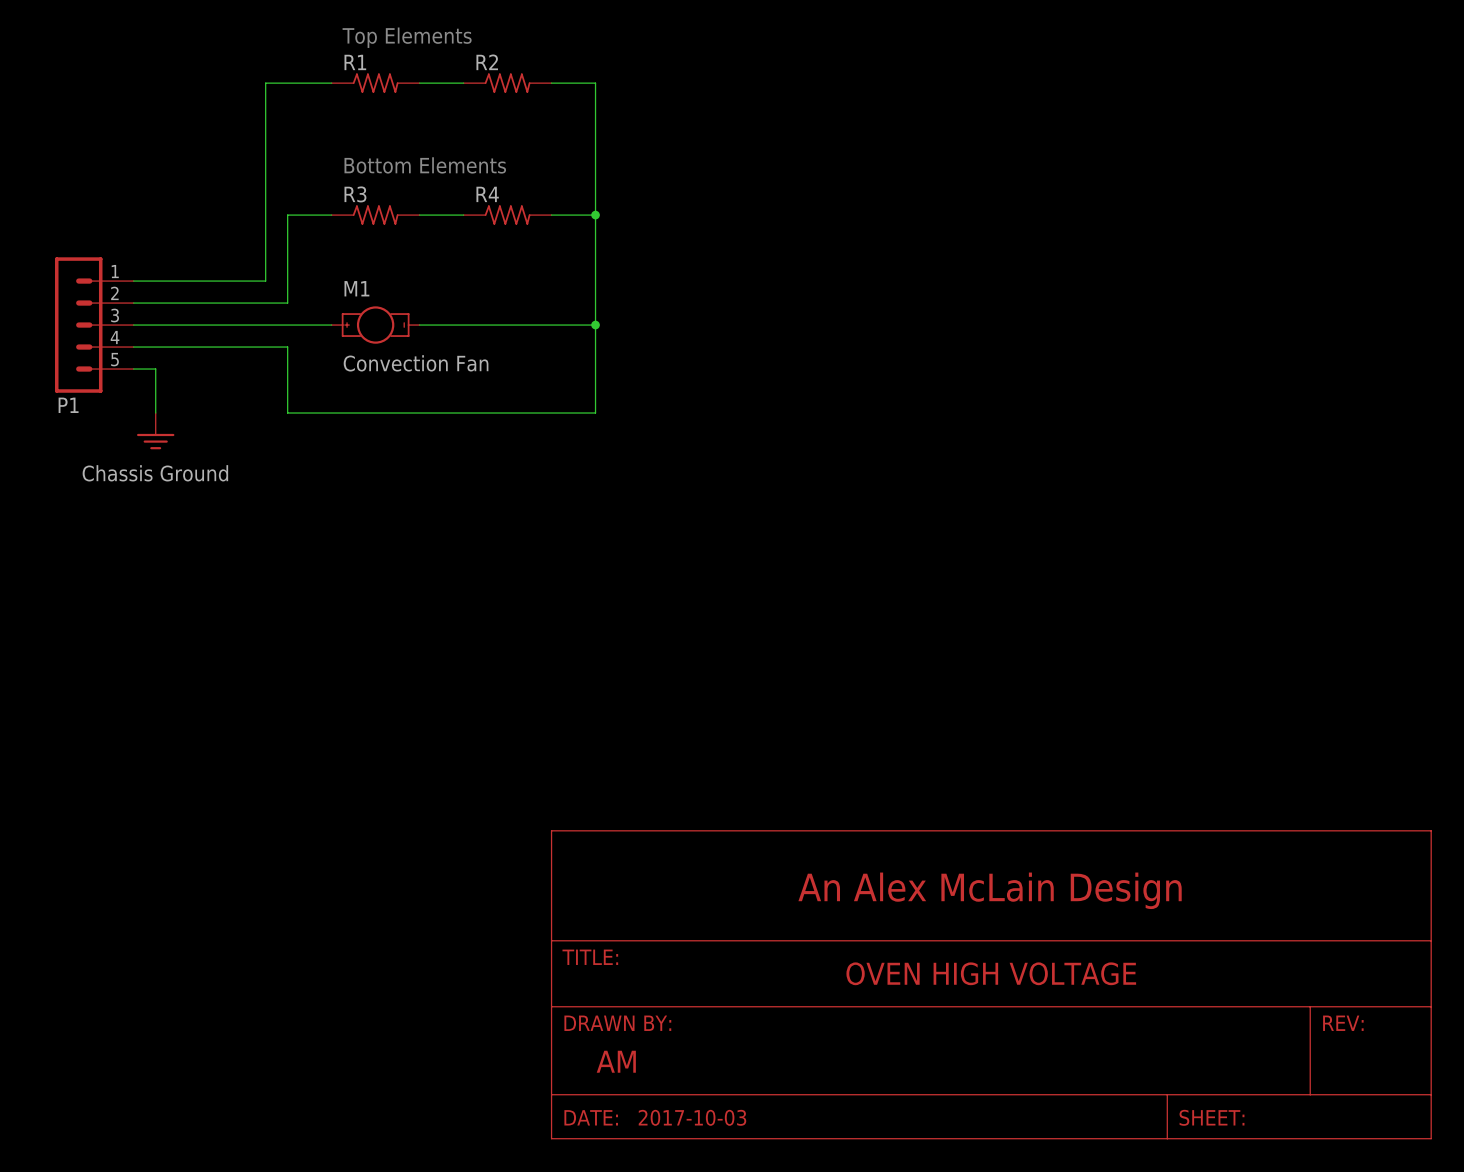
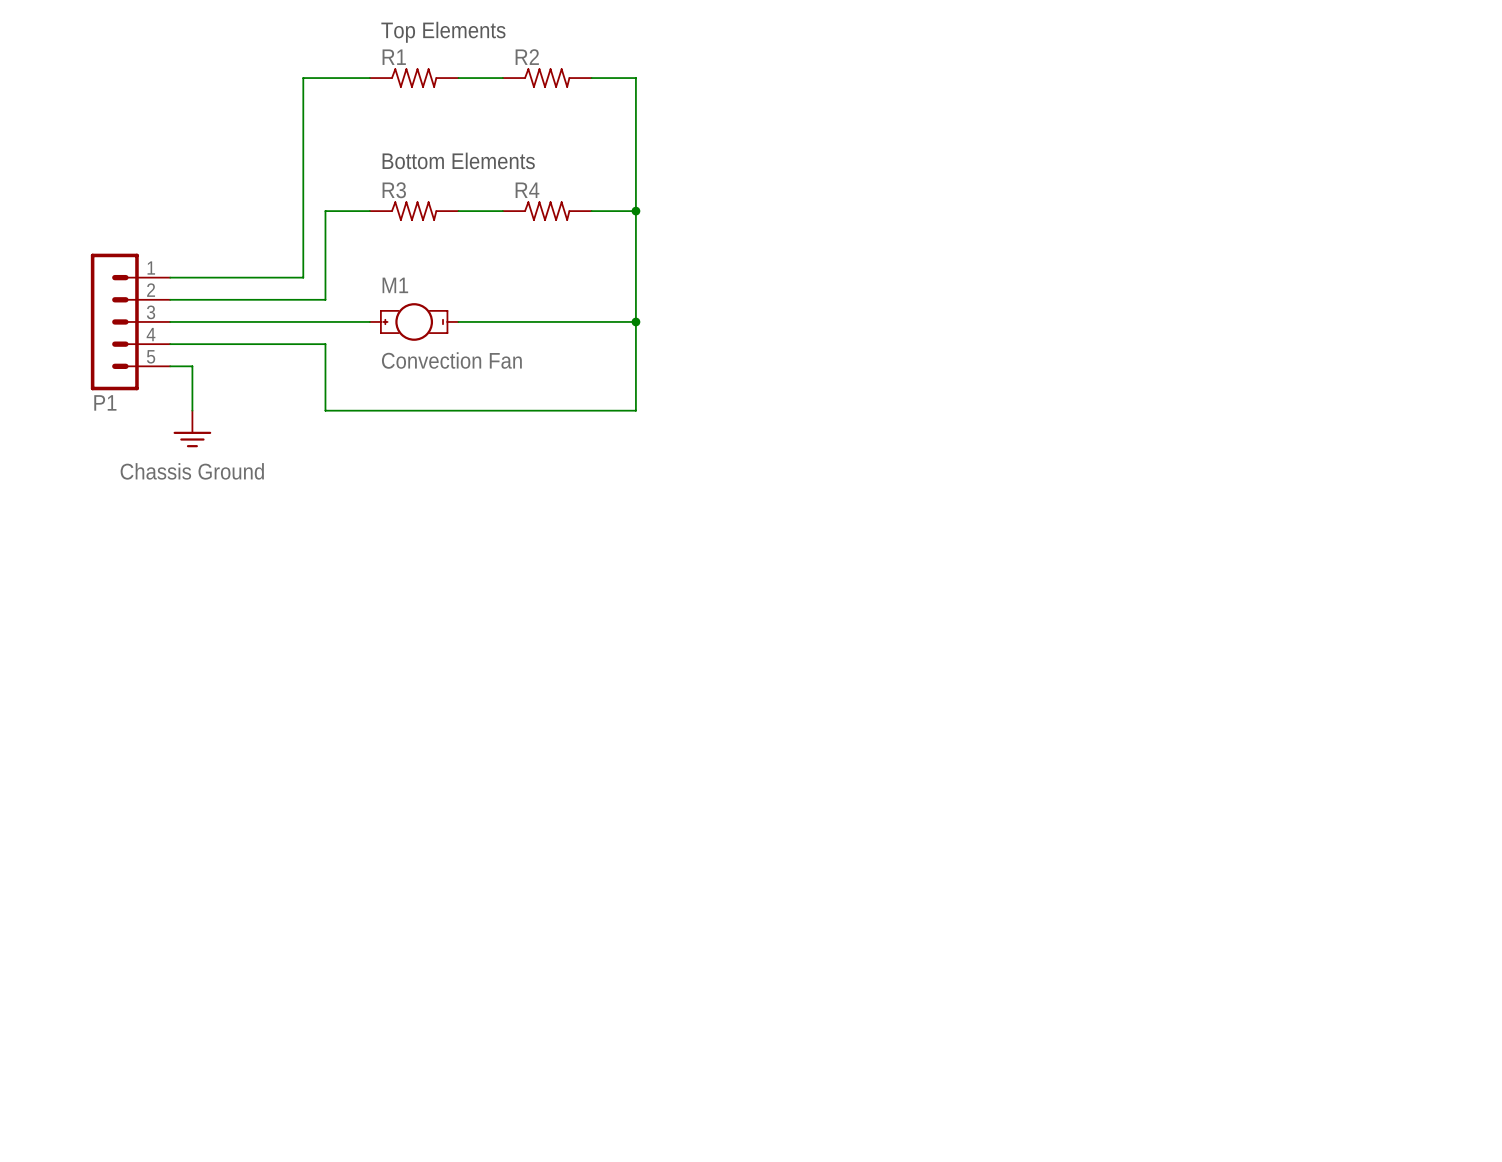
part: (991, 984) -> none

